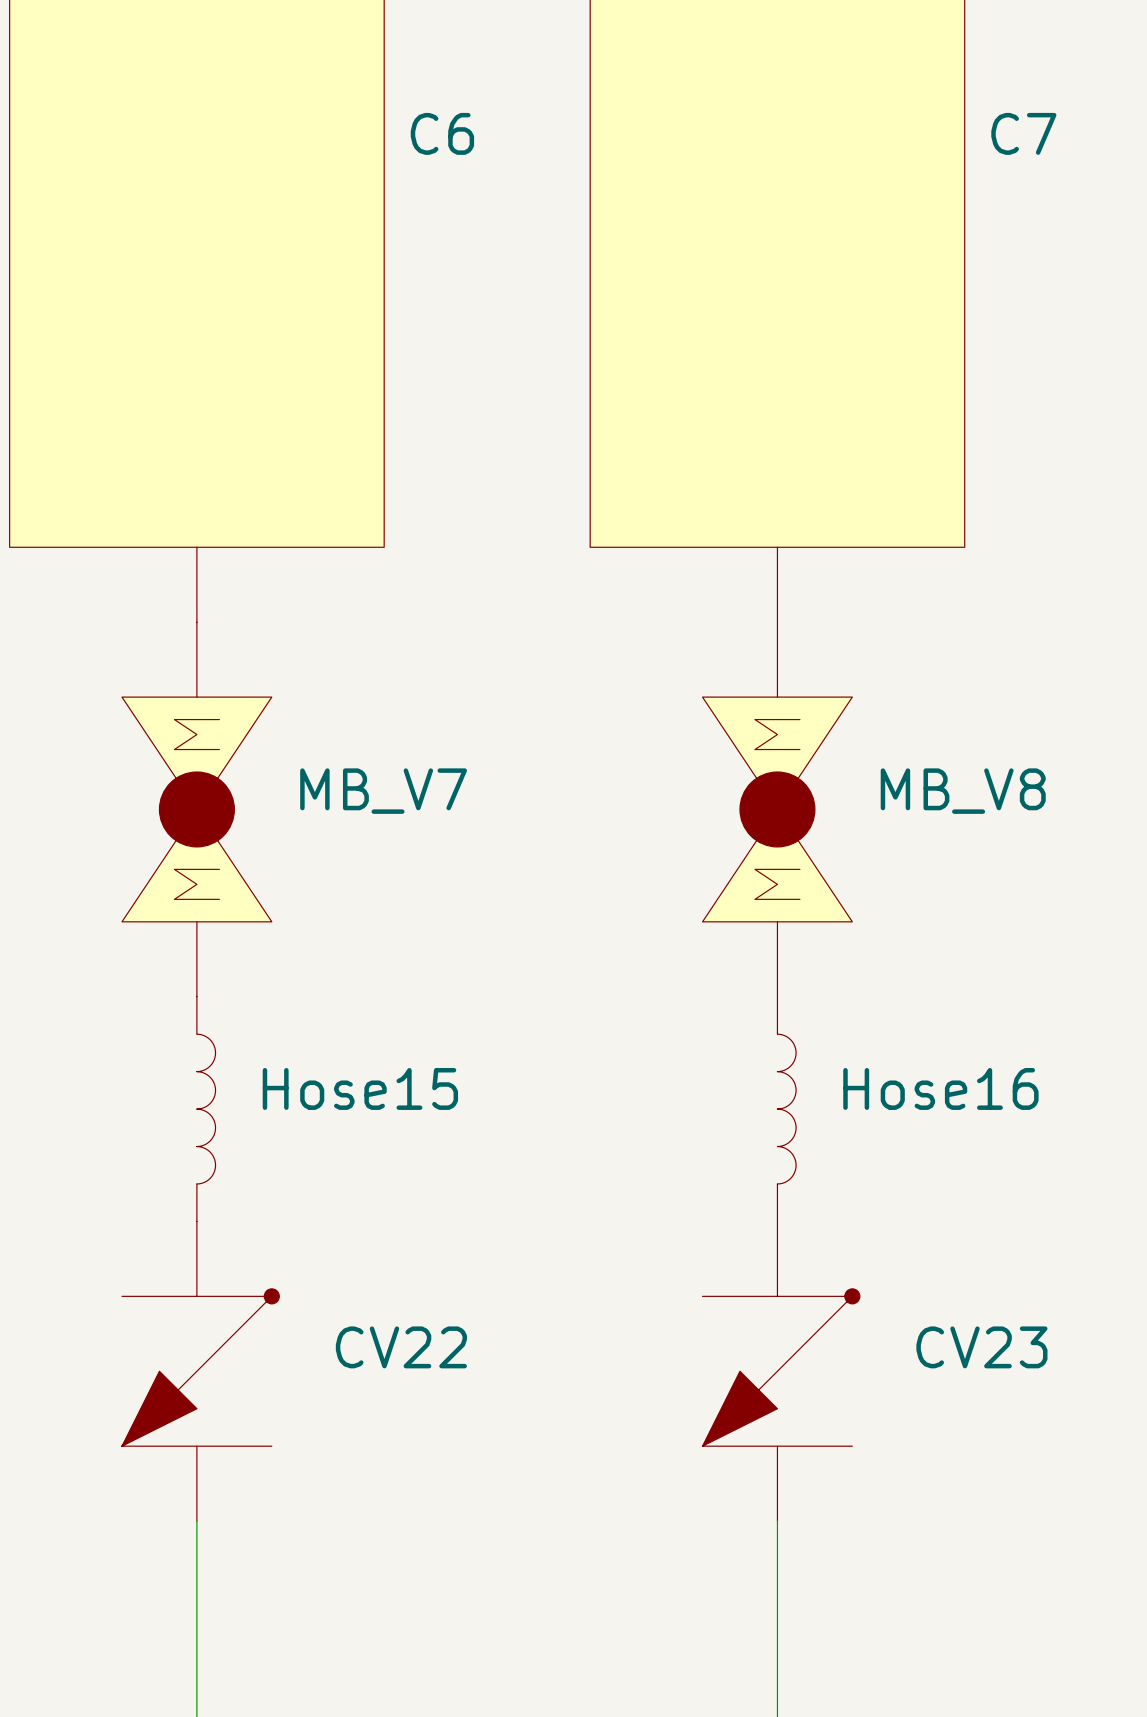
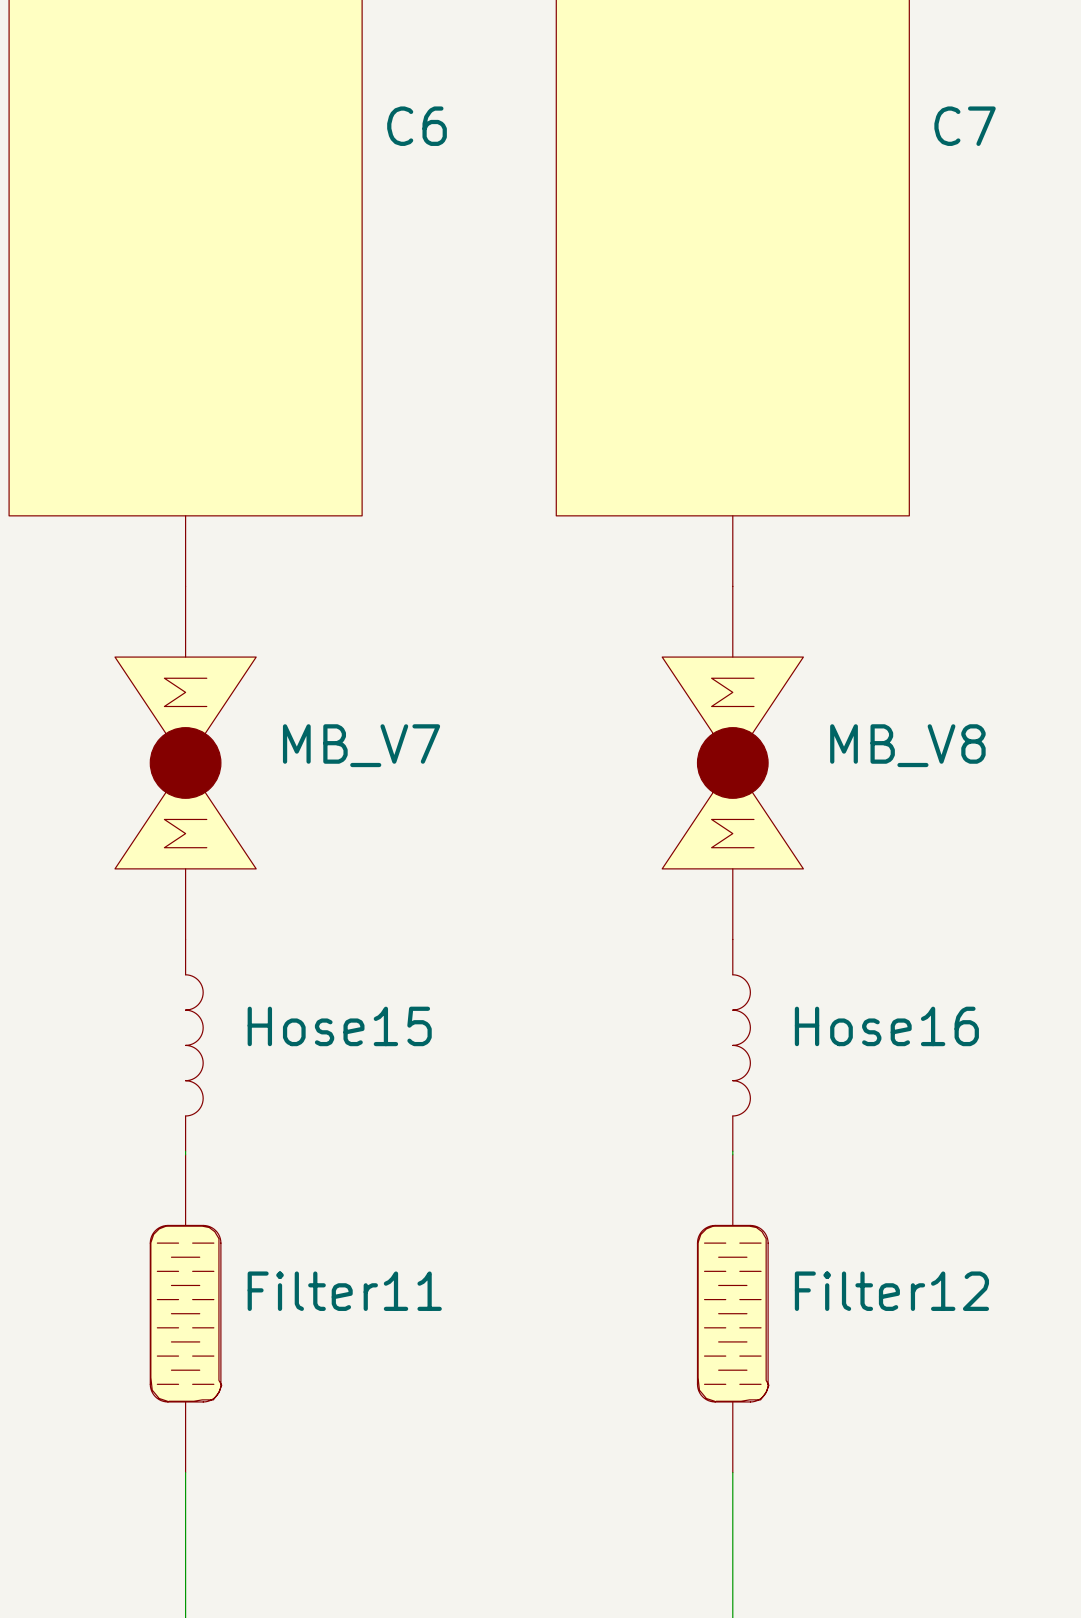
CV22: (200, 1371) -> none
CV23: (781, 1371) -> none
Filter11: none -> (186, 1313)
Filter12: none -> (733, 1313)

